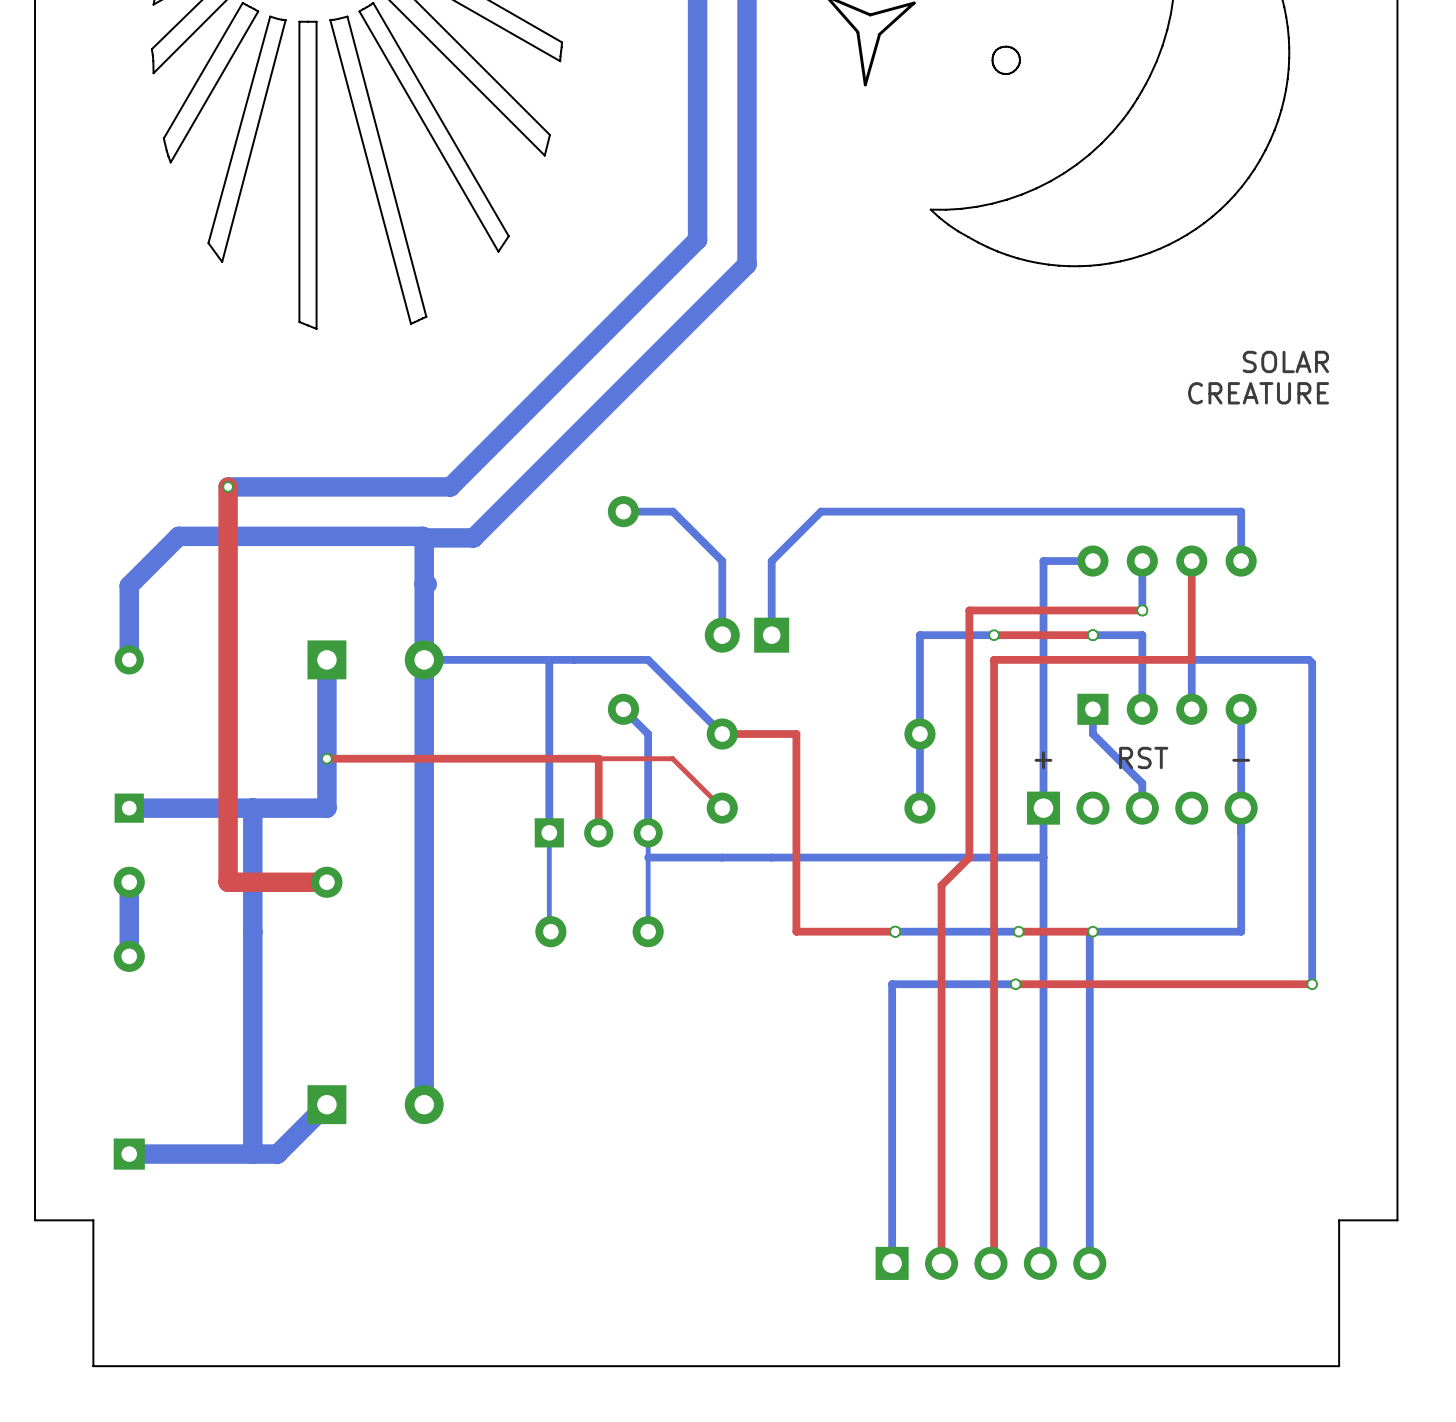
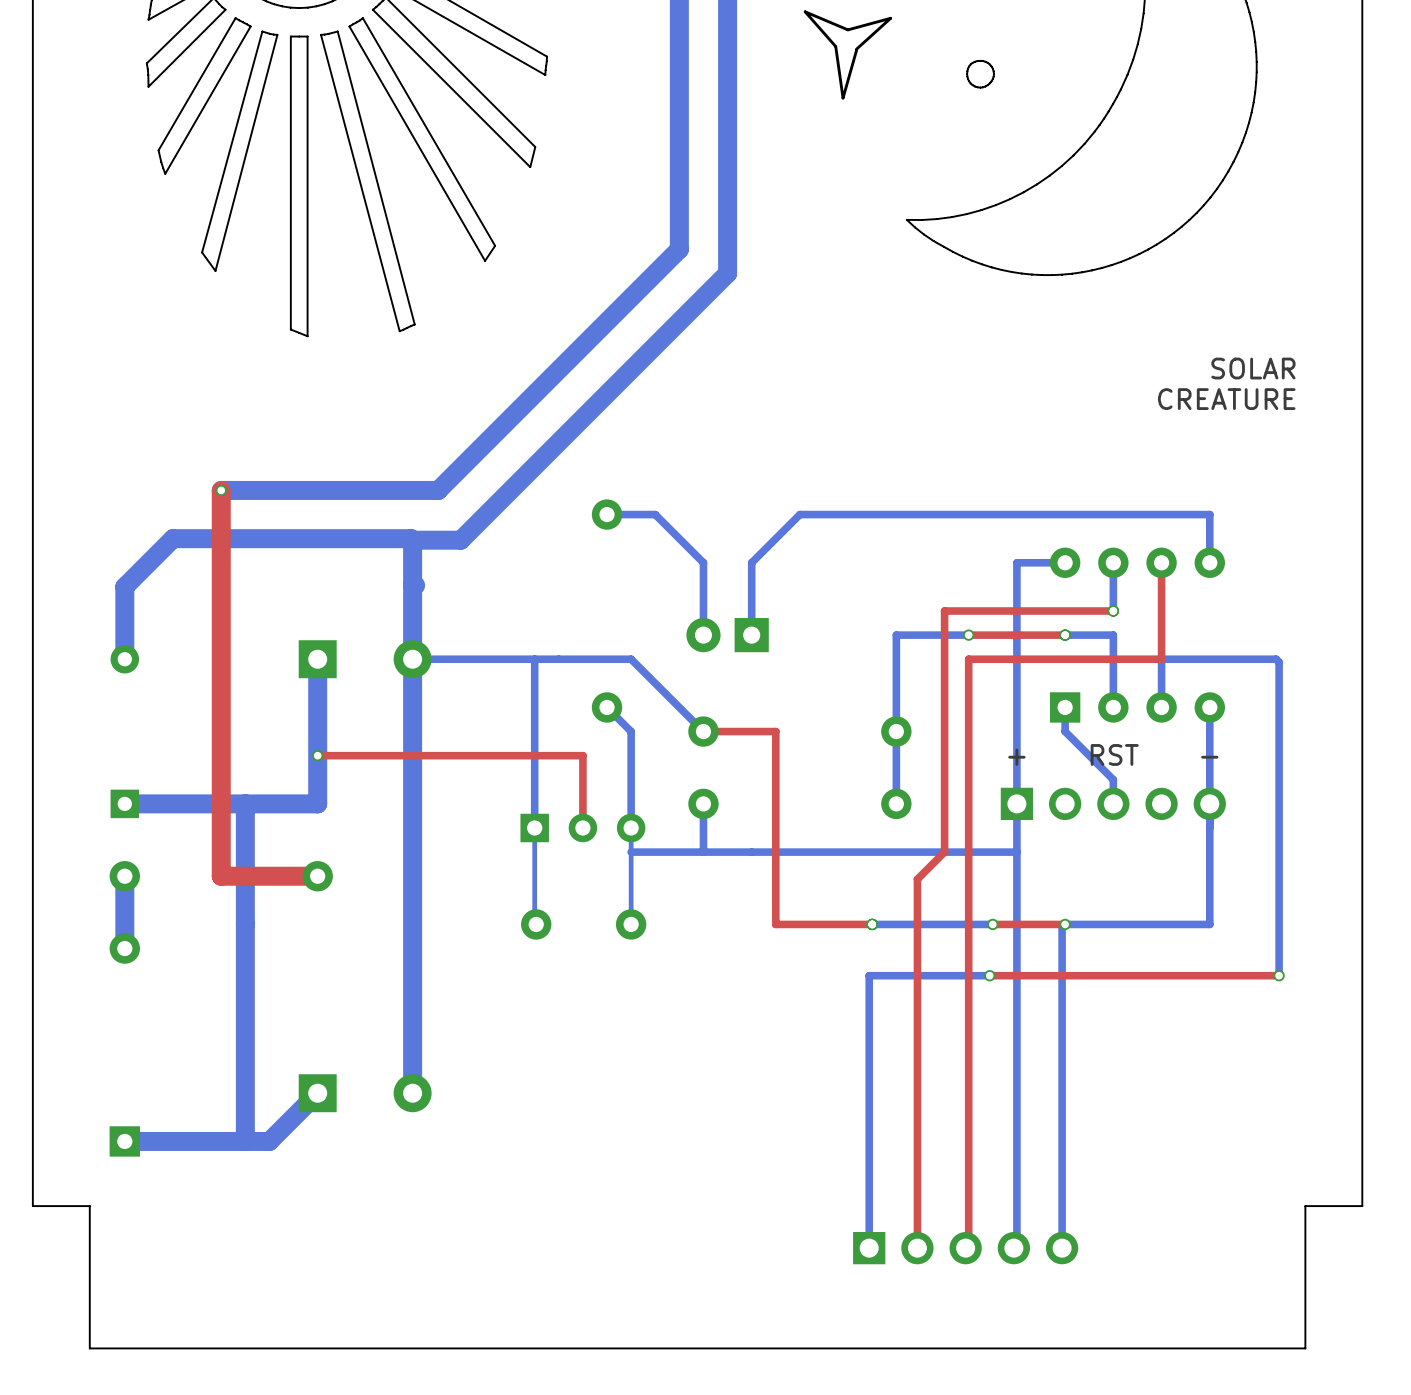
top track: (598, 758) (672, 758) (722, 808) -> none
bottom track: none -> (703, 803) (703, 852)

